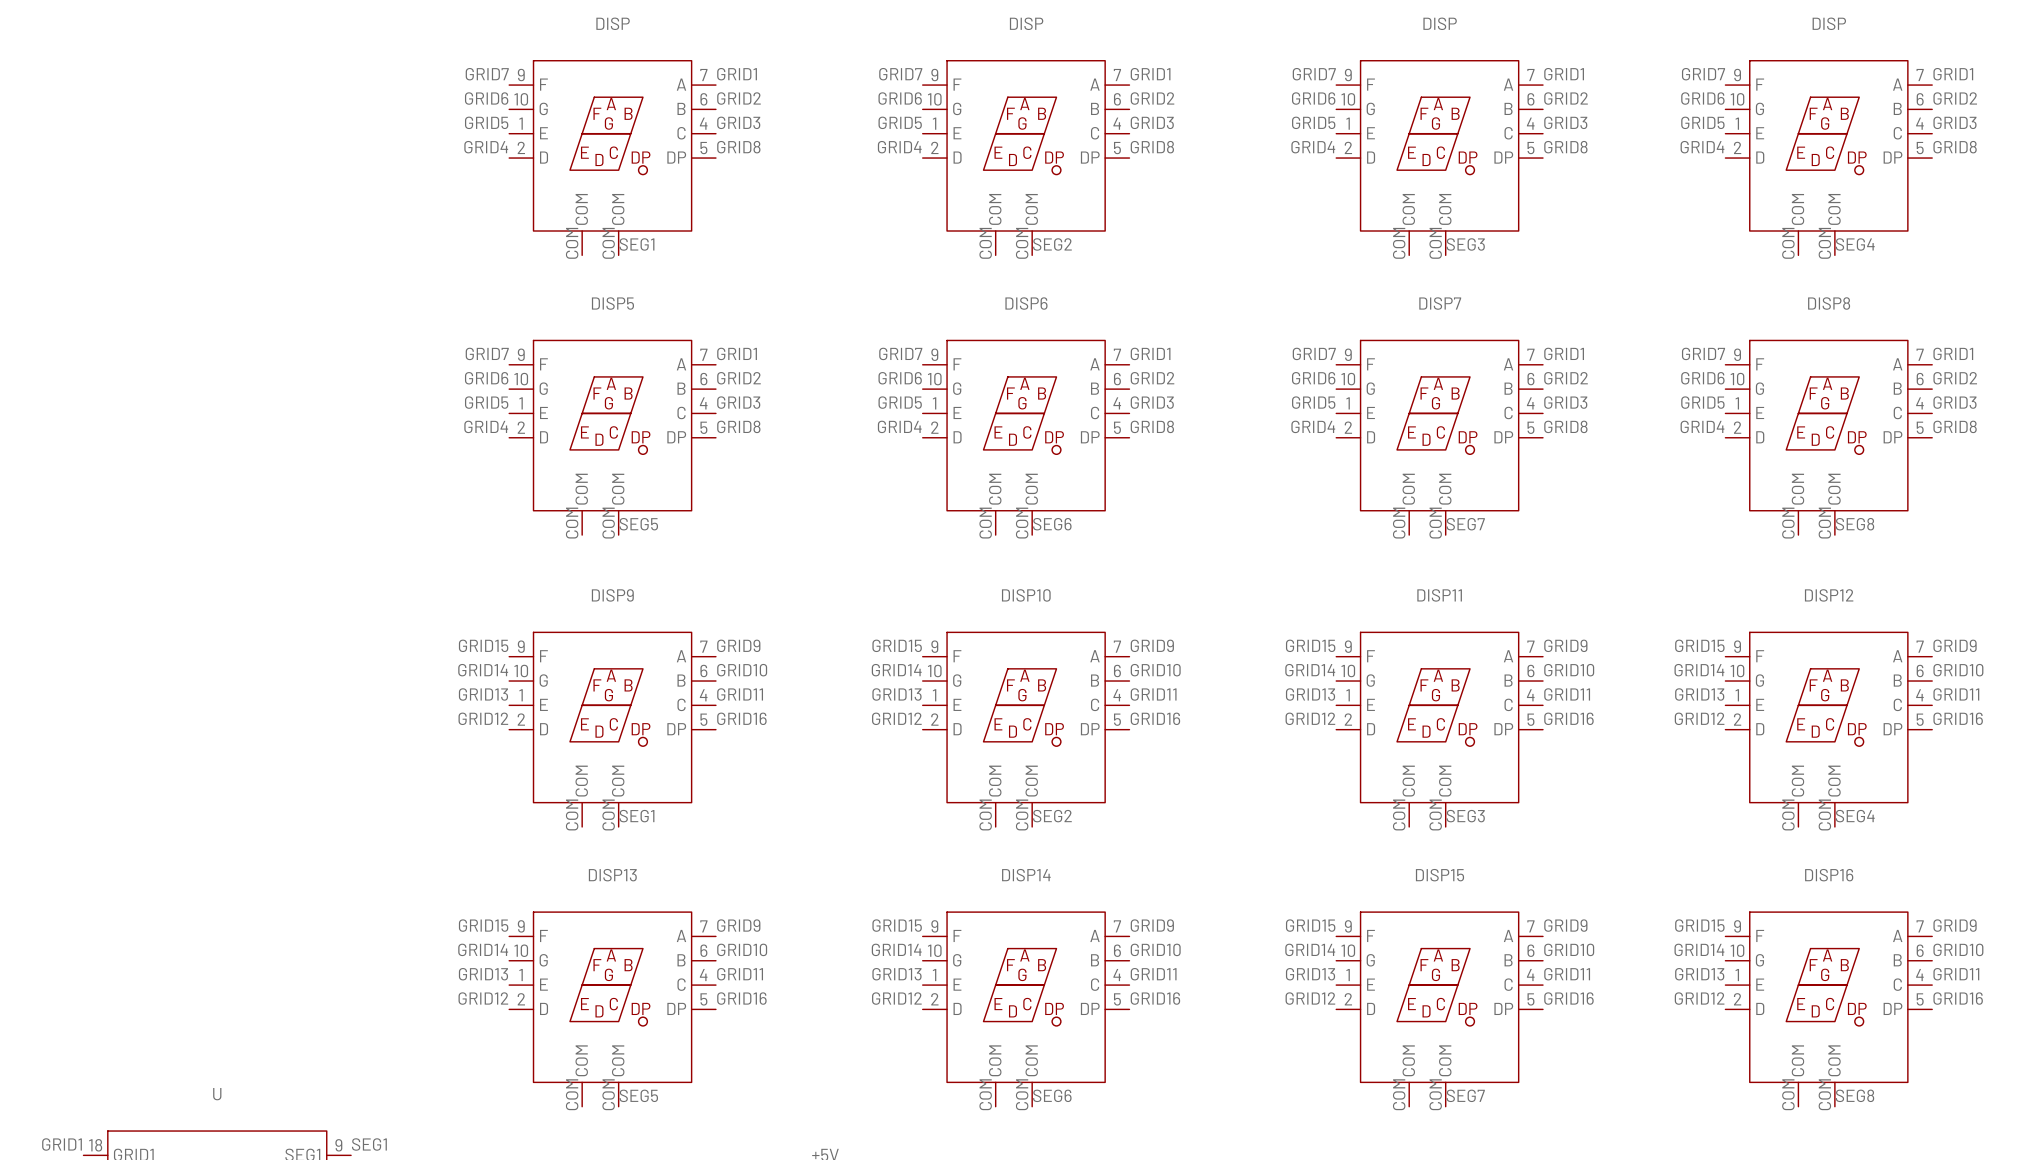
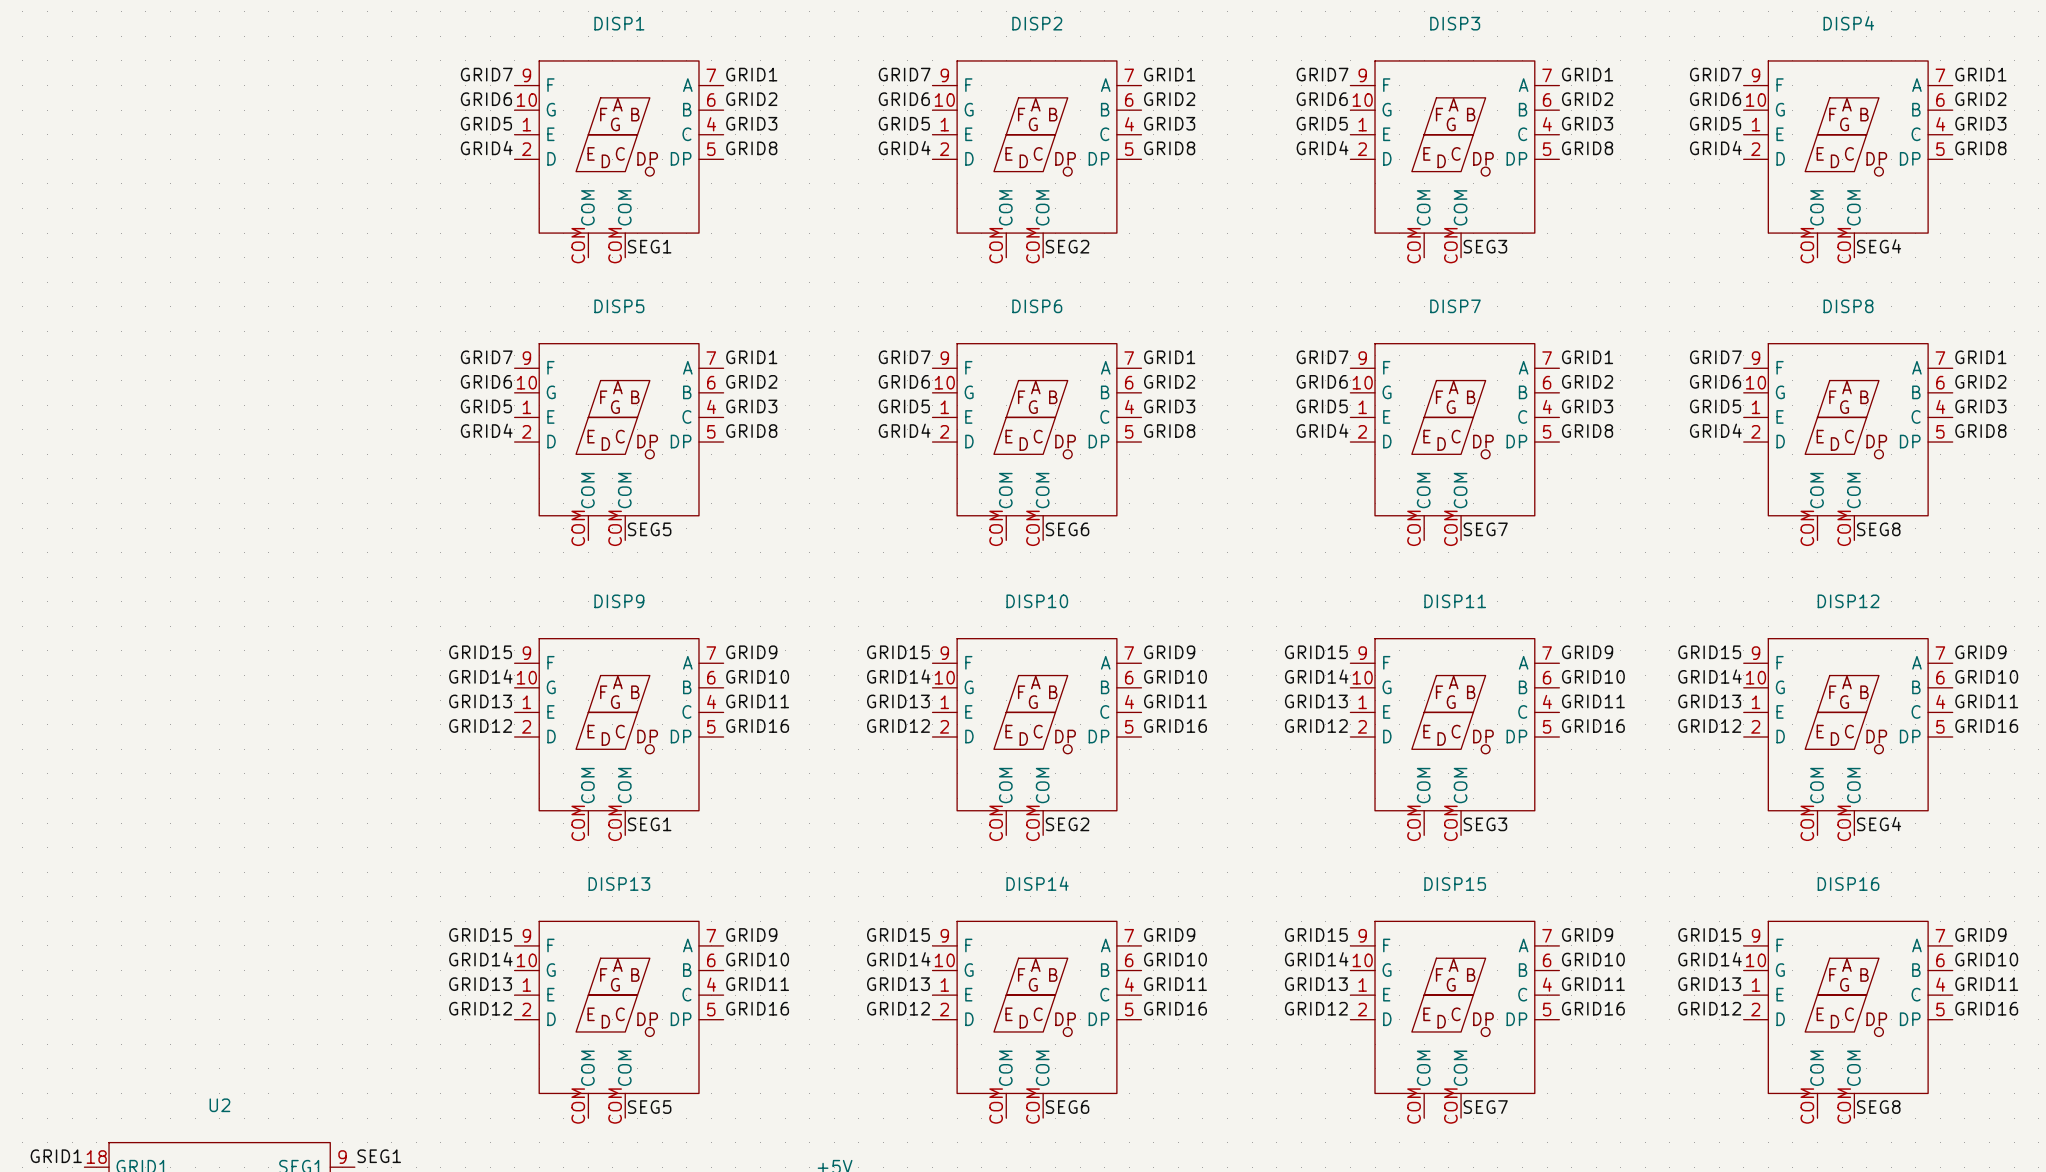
DISP name: DISP (613, 23) -> DISP1 (619, 23)
DISP name: DISP (1026, 23) -> DISP2 (1037, 23)
DISP name: DISP (1440, 23) -> DISP3 (1455, 23)
DISP name: DISP (1829, 23) -> DISP4 (1848, 23)
U name: U (217, 1094) -> U2 (219, 1105)

